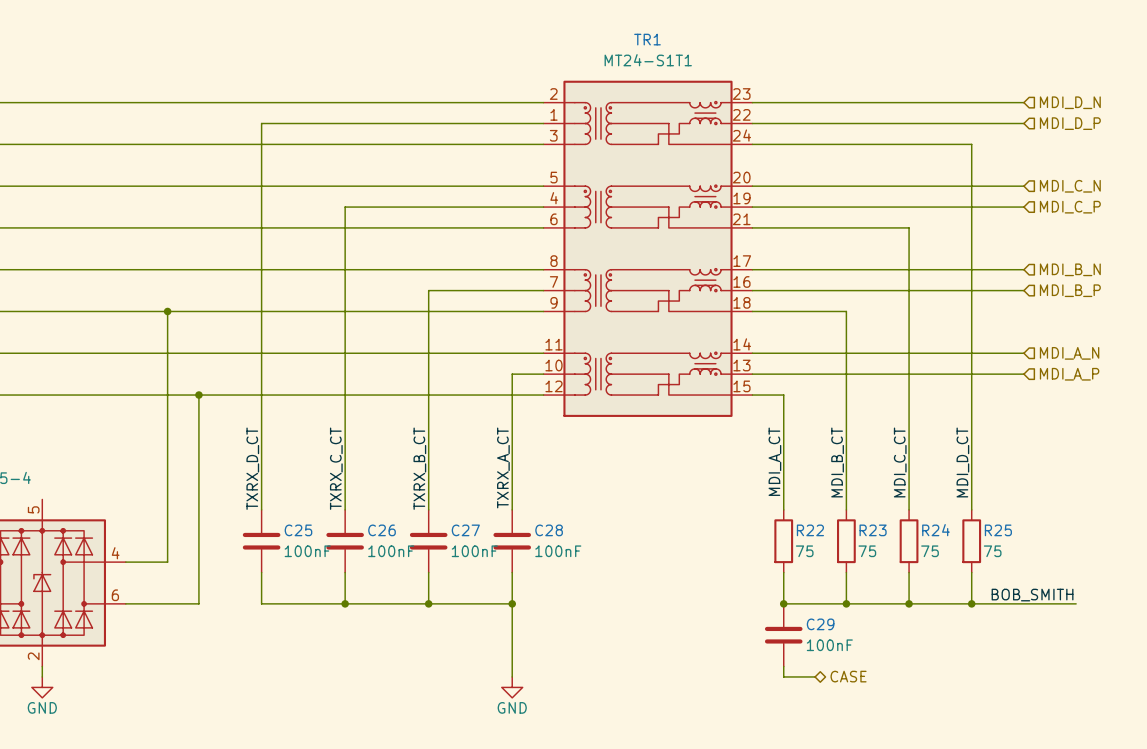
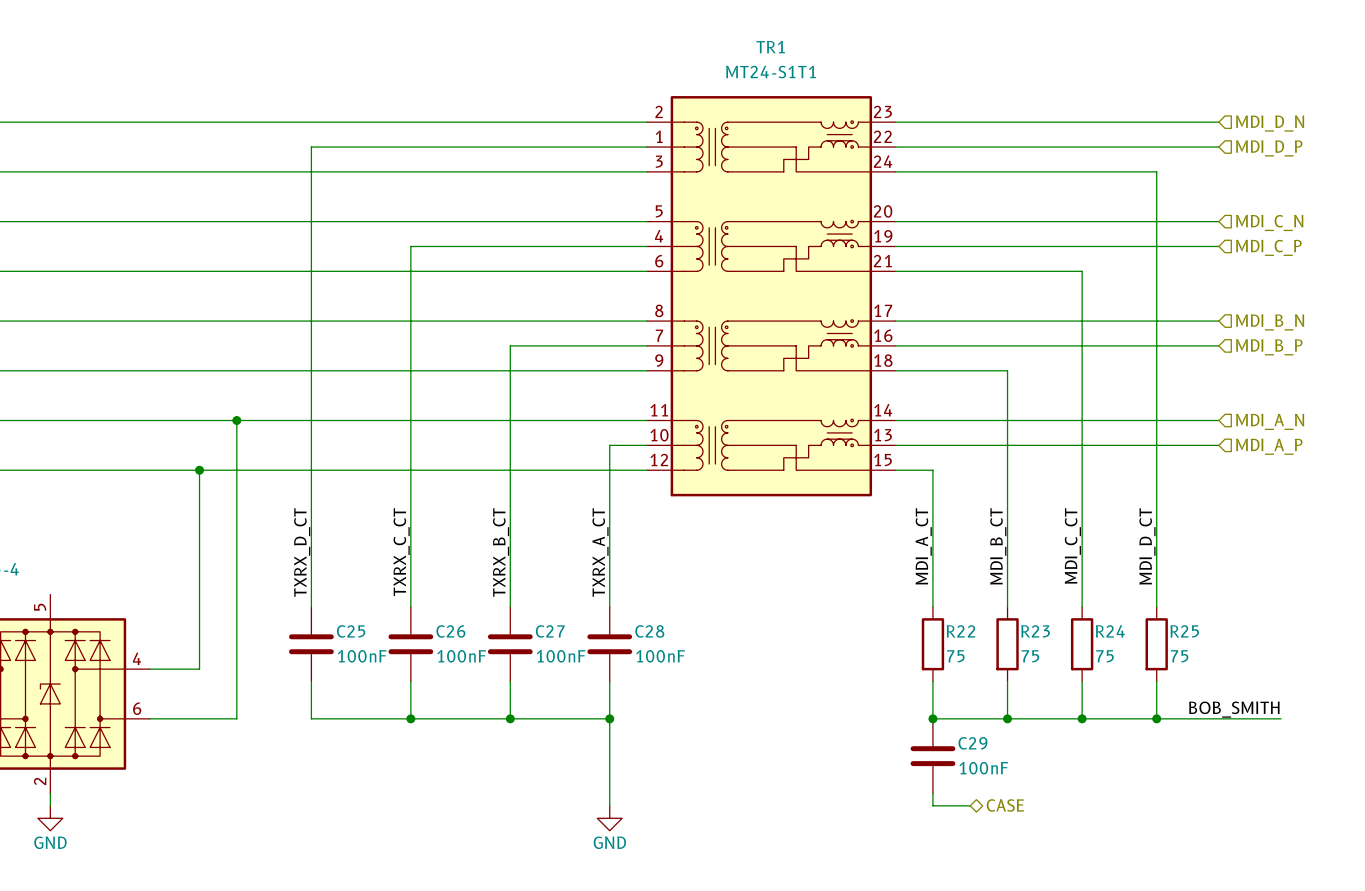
wire: (167, 311) (167, 395) -> none
junction: (167, 311) -> none
wire: none -> (236, 420) (236, 470)
junction: none -> (236, 420)
junction: none -> (199, 470)
junction: (198, 395) -> none

